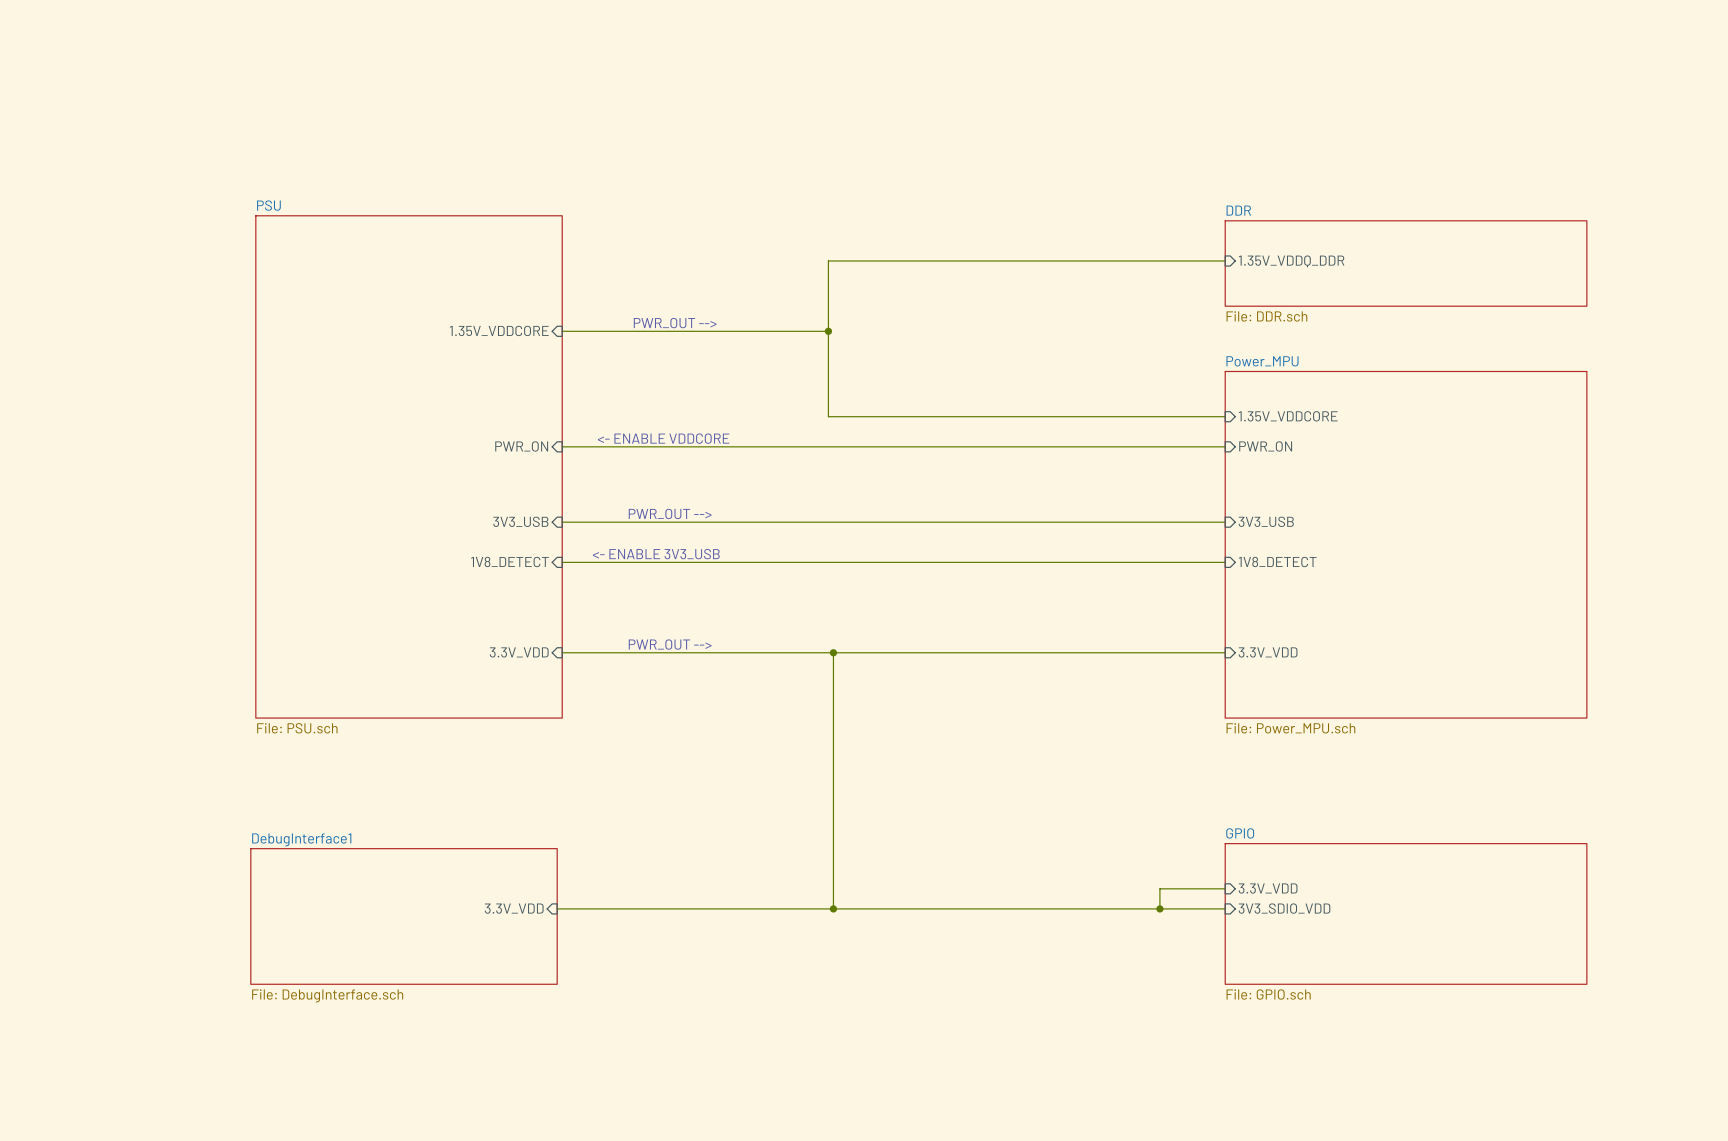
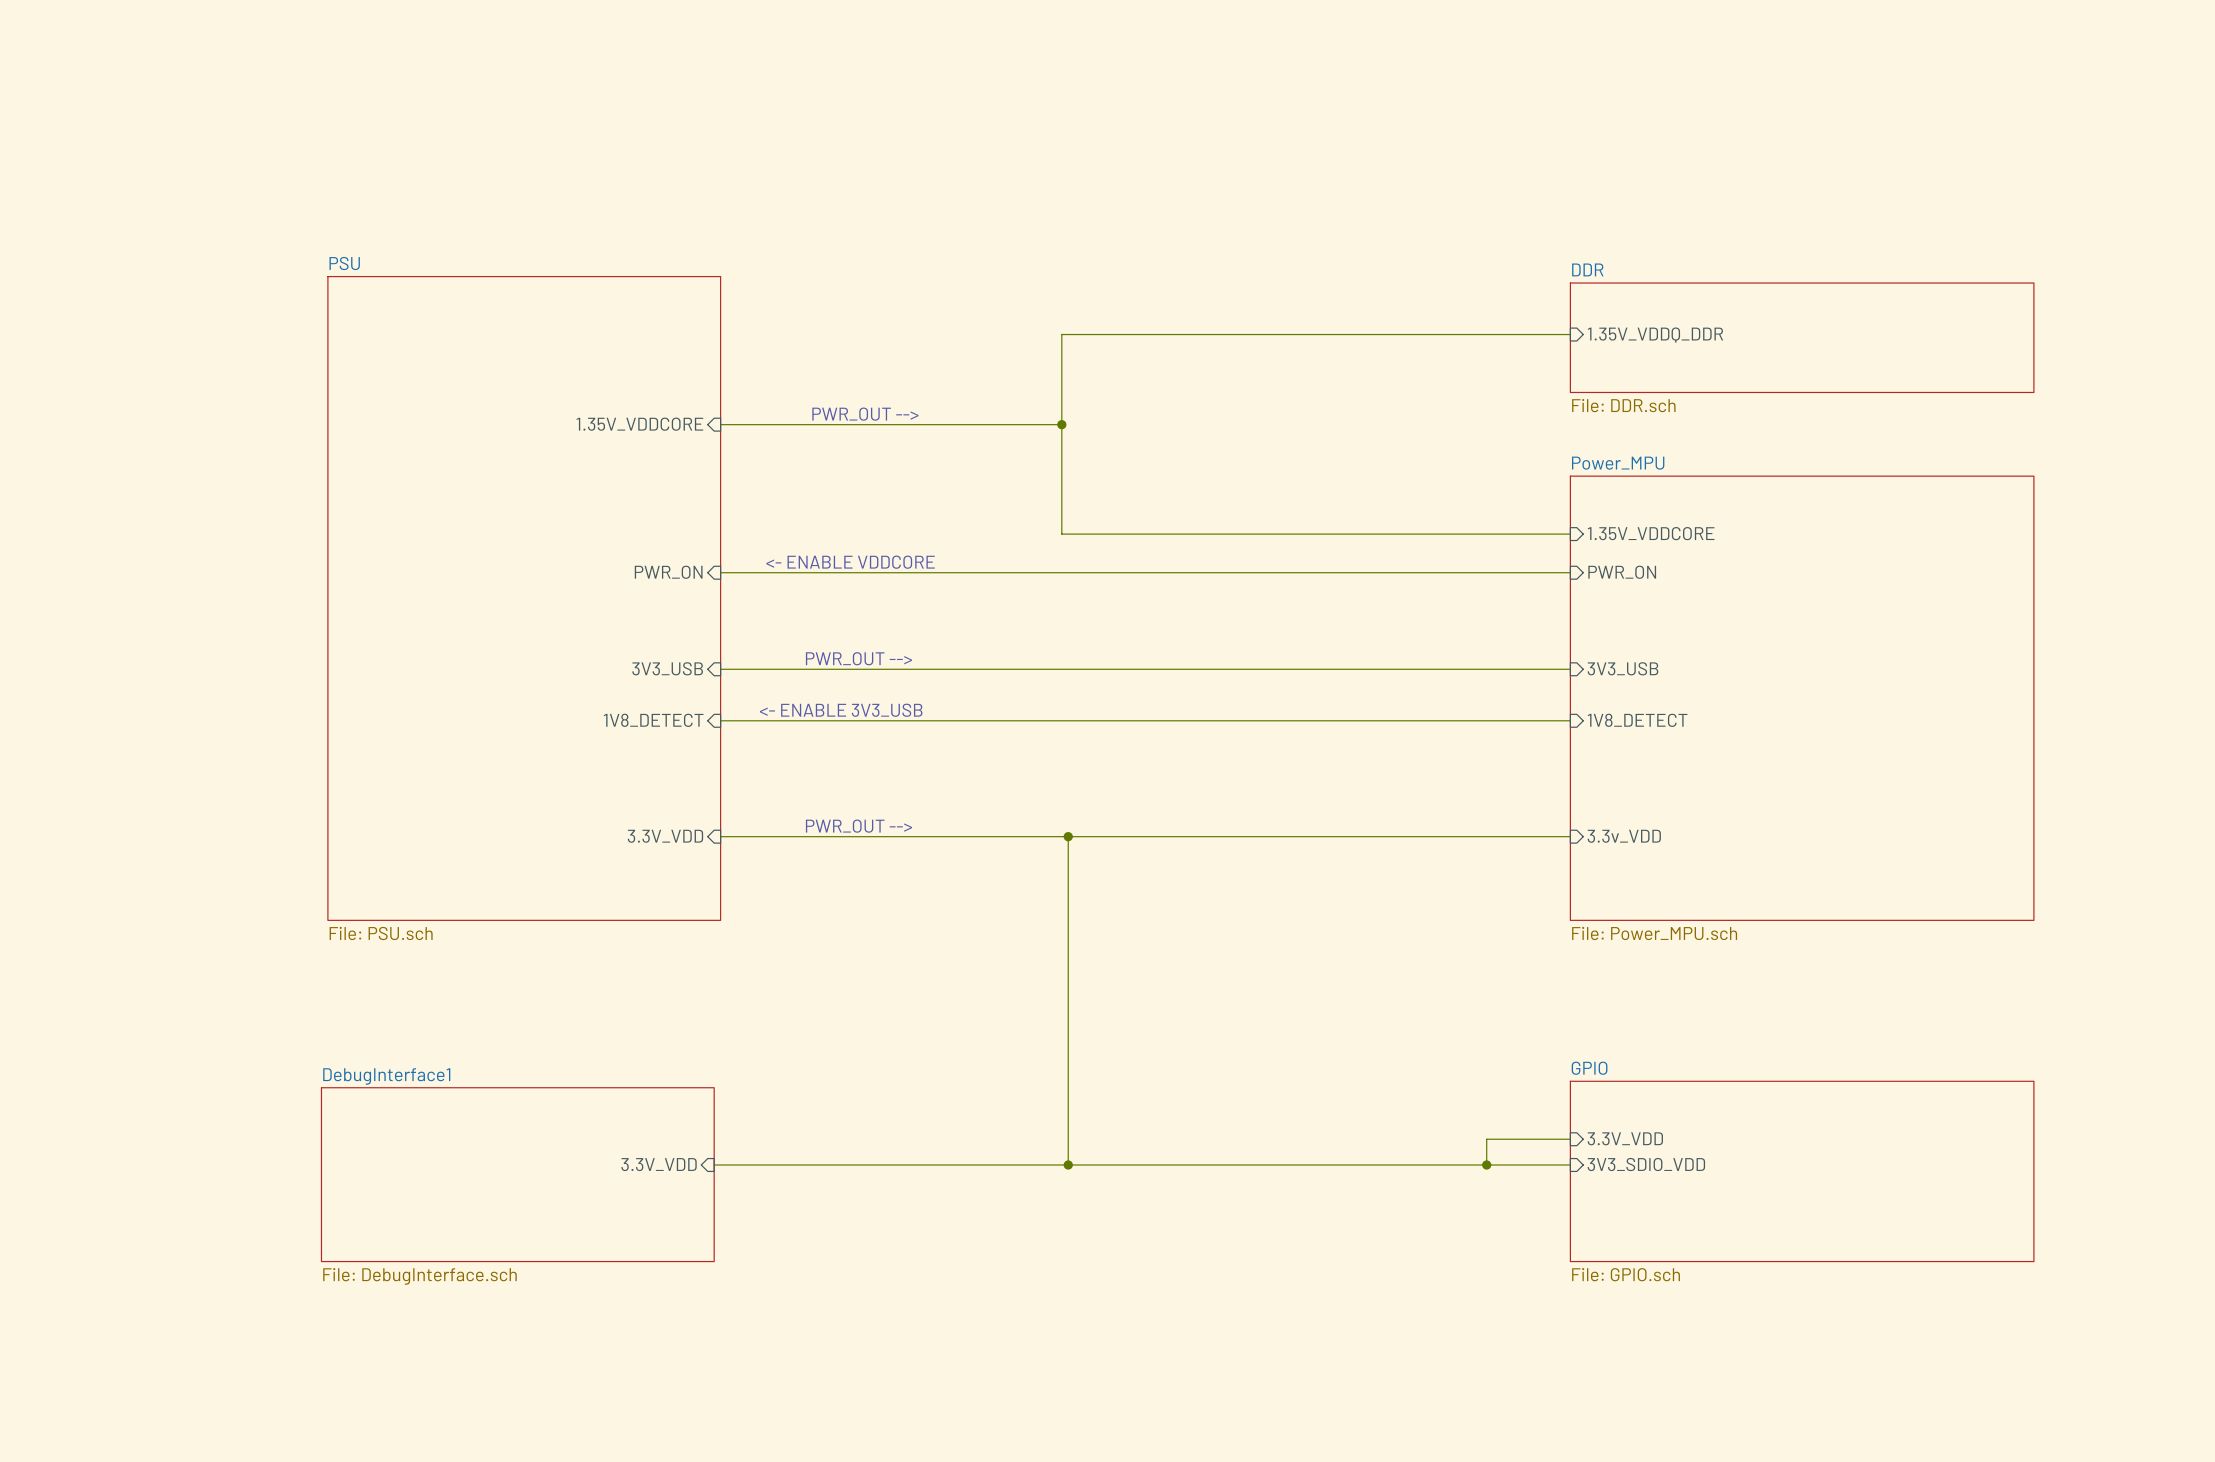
sheet pin: 3.3V_VDD (1268, 652) -> 3.3v_VDD (1624, 836)

